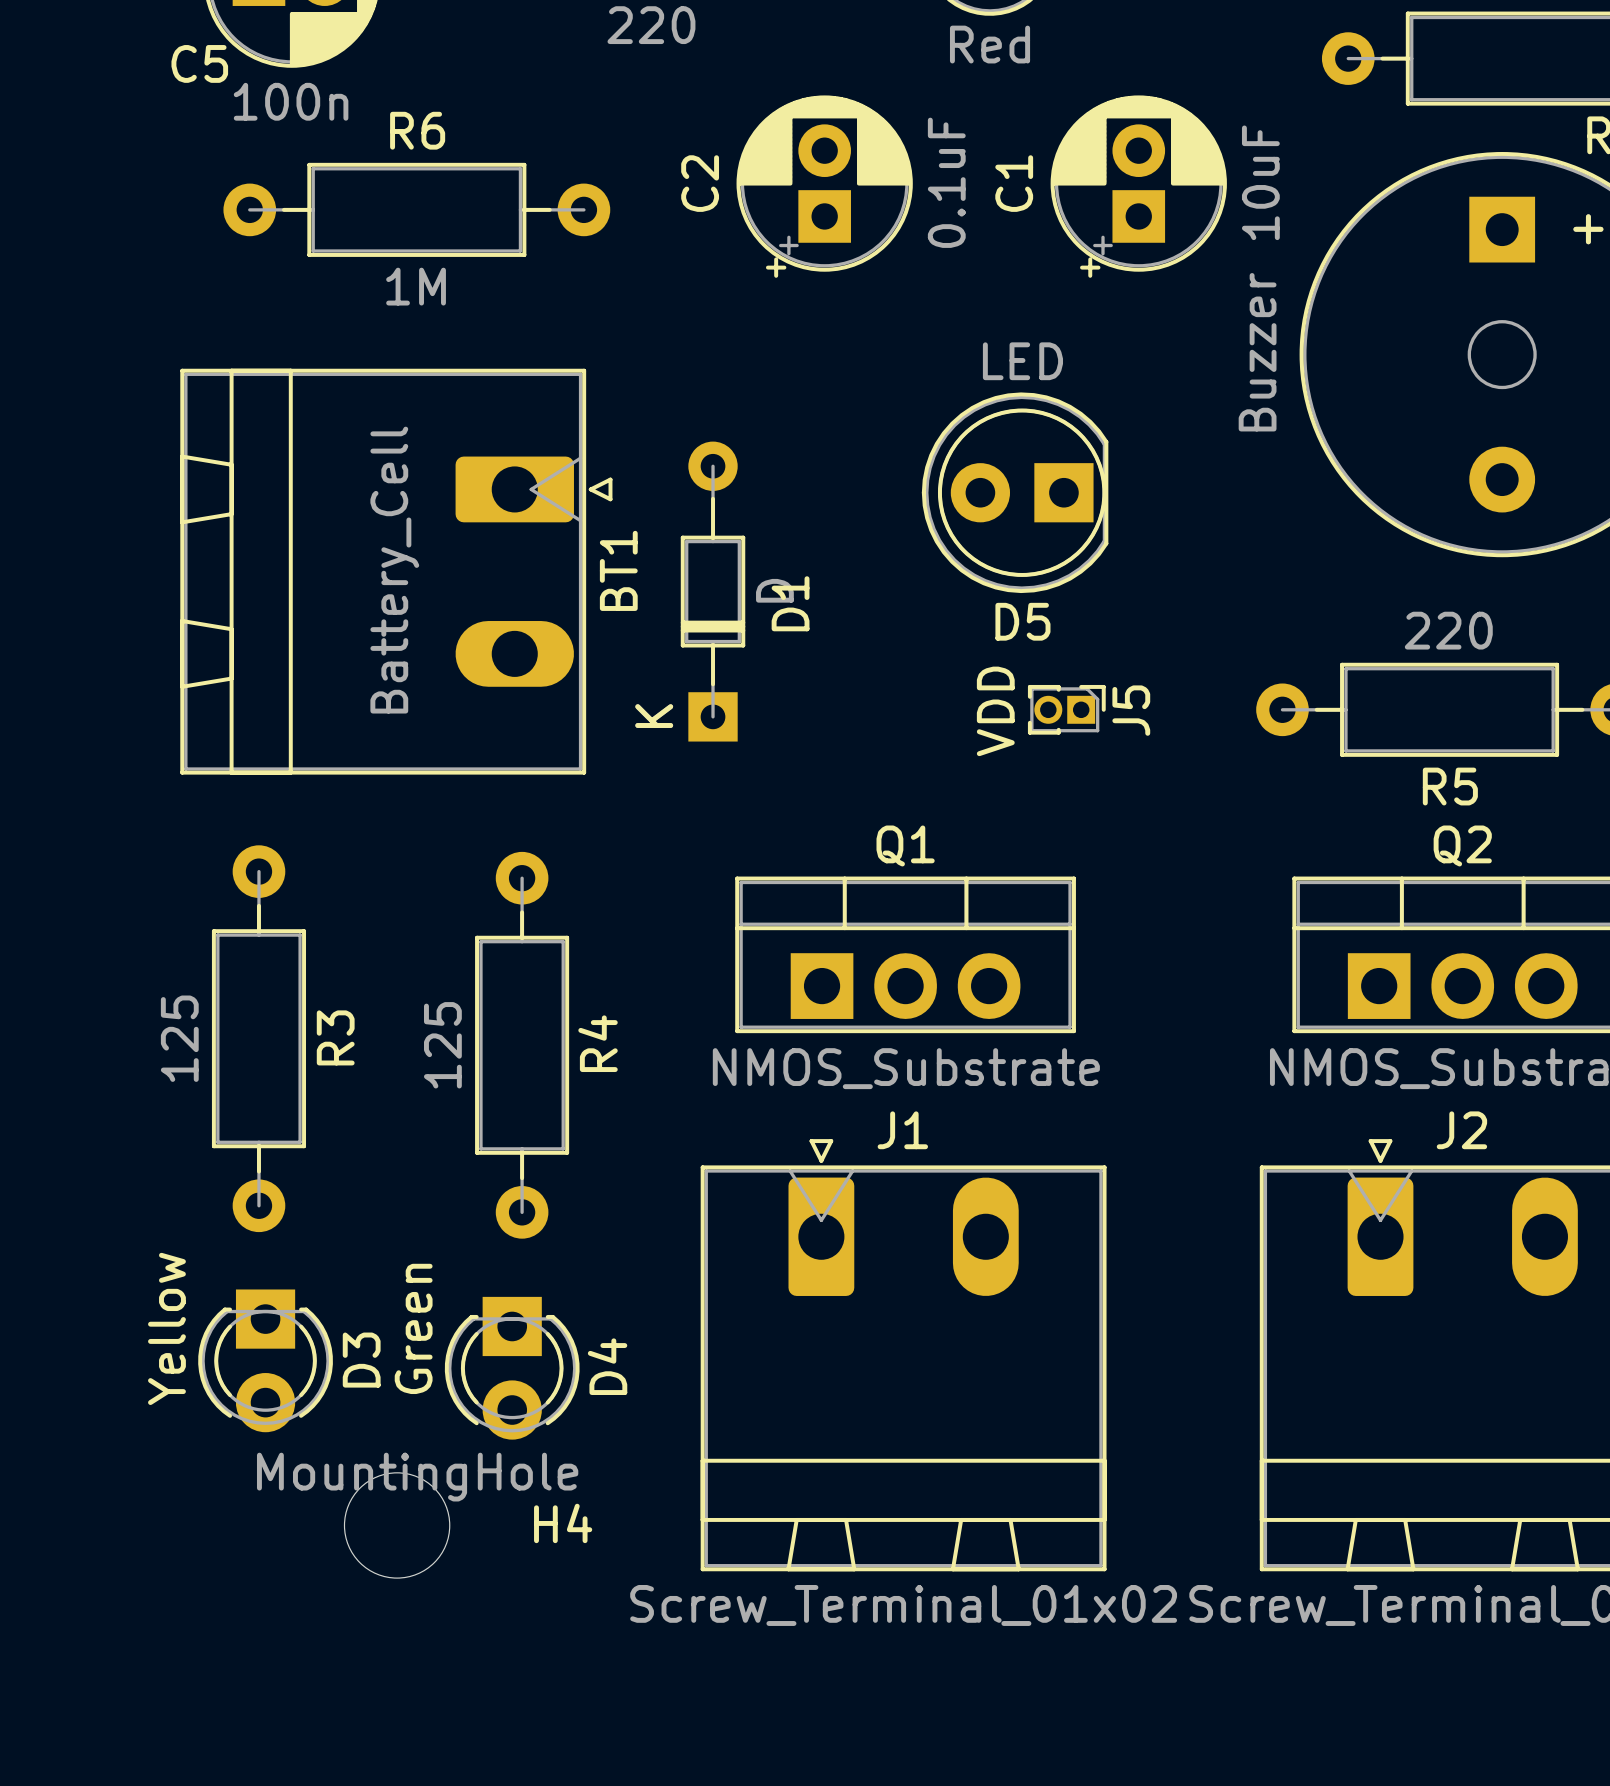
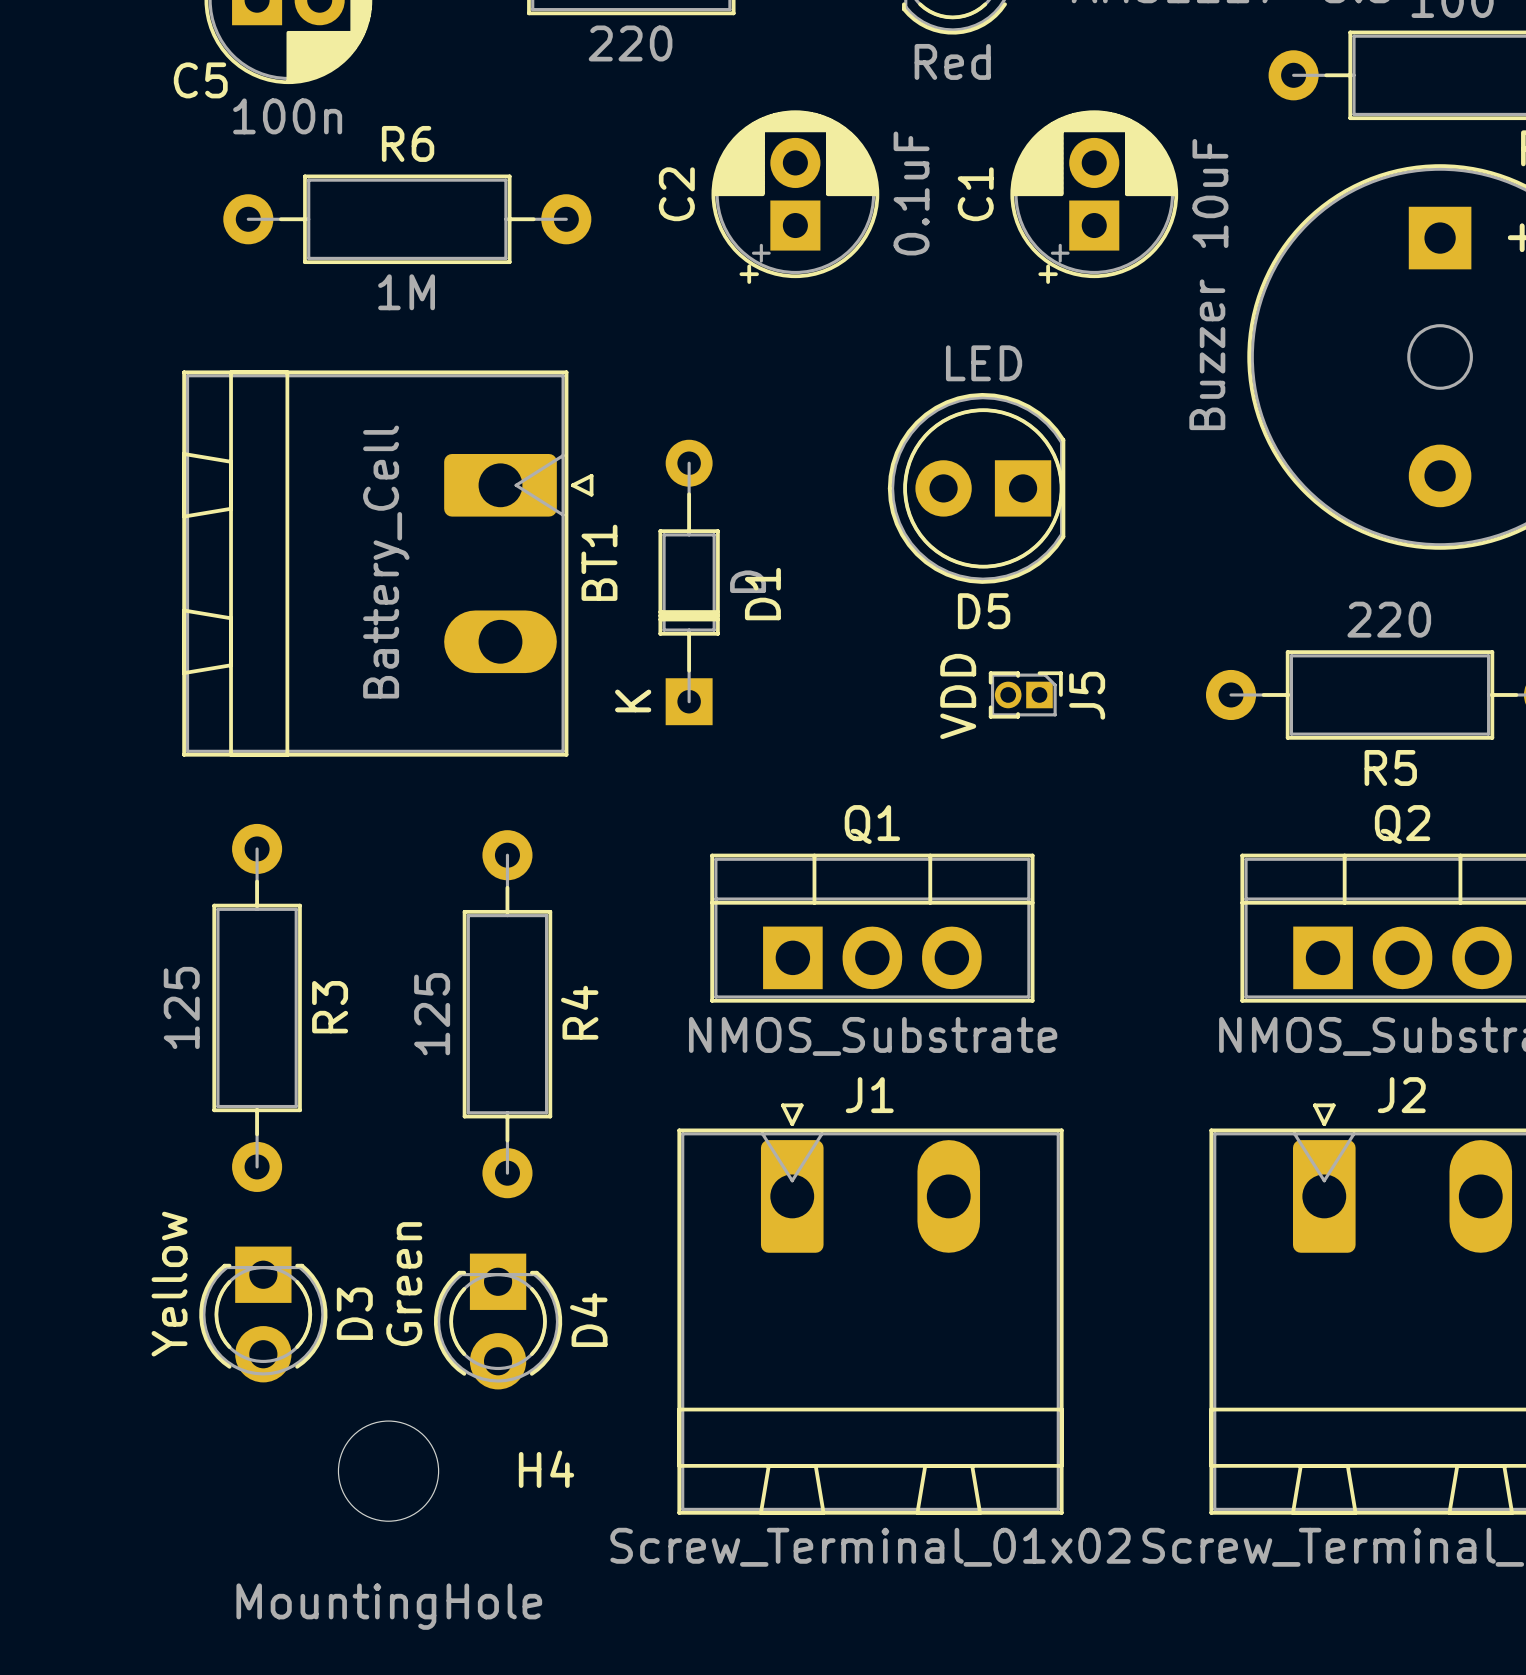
H4 value position: MountingHole (417, 1477) -> MountingHole (389, 1606)

